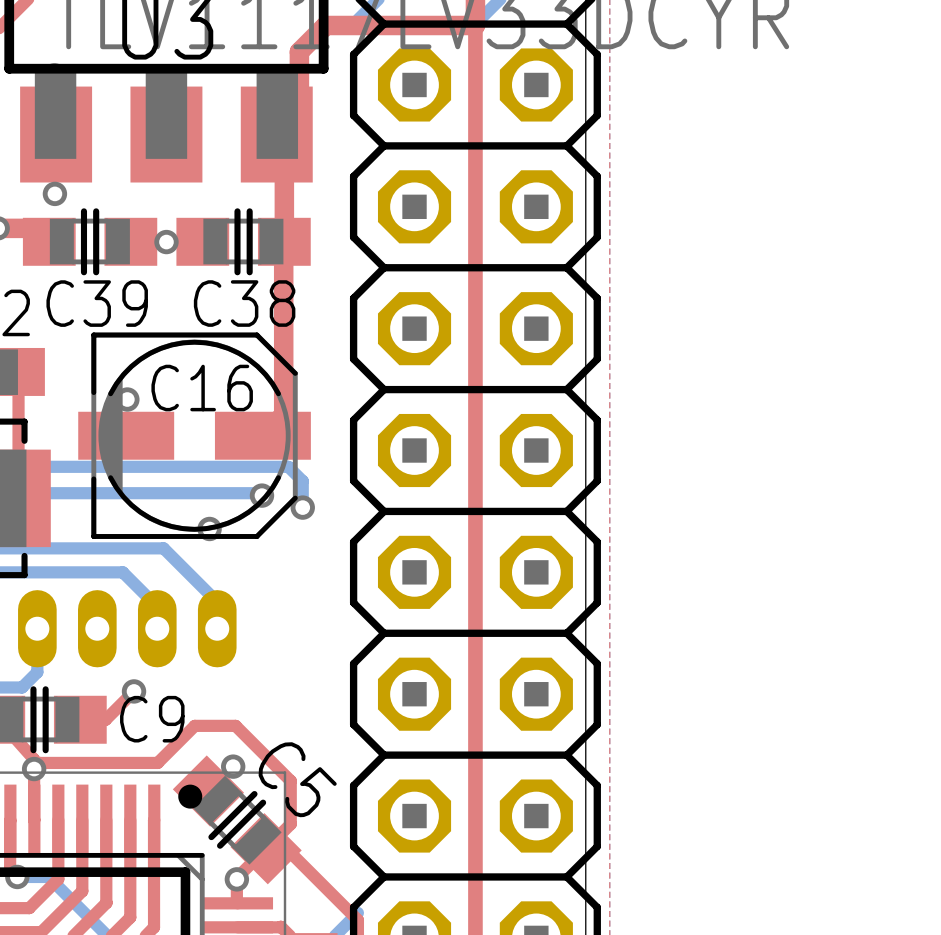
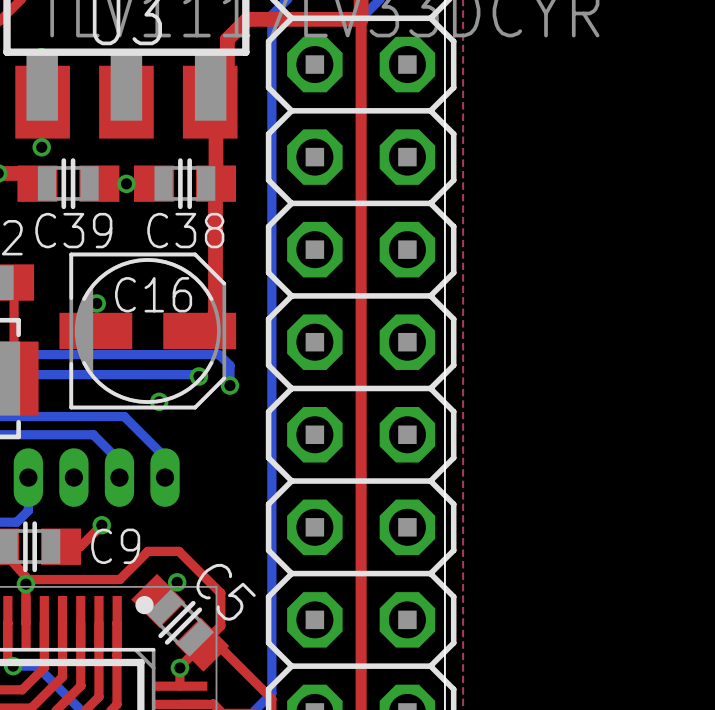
bottom track: none -> (271, 14) (271, 693)

